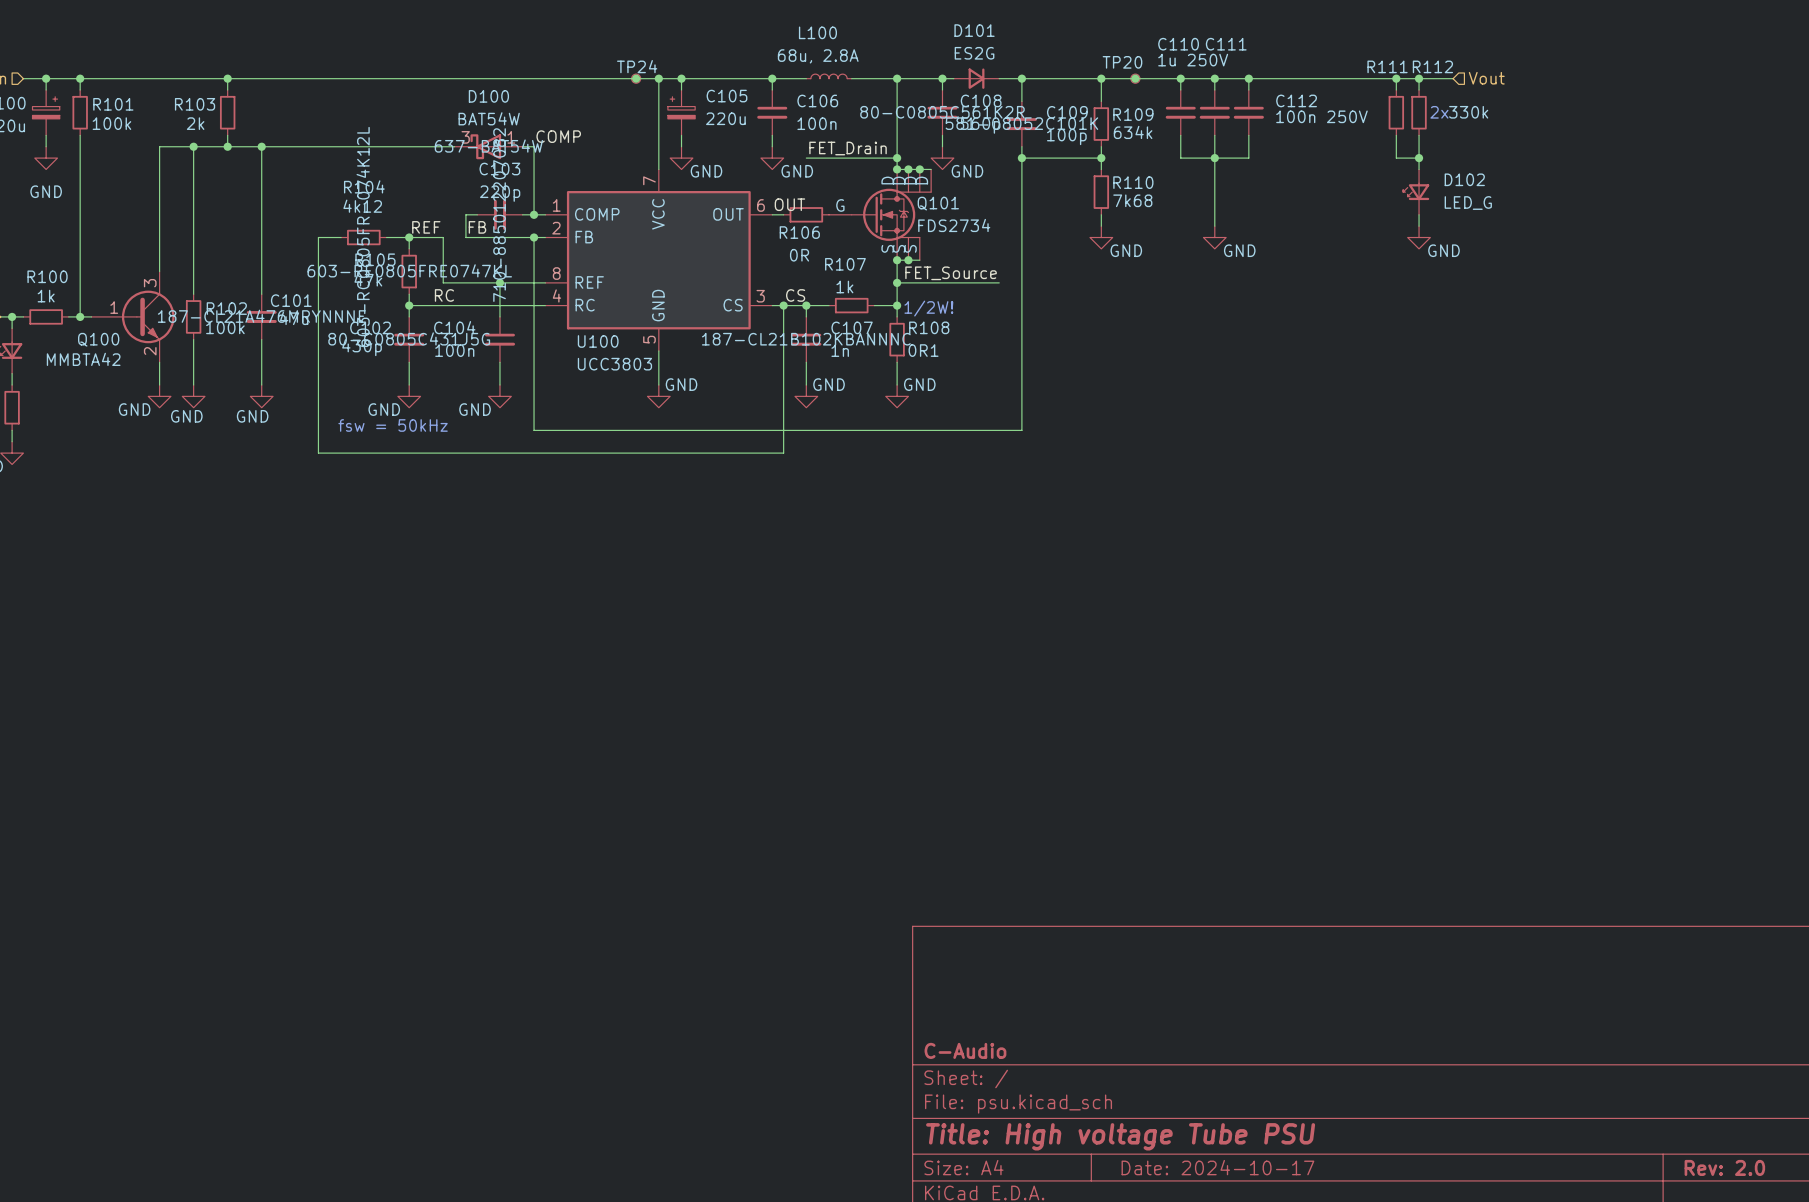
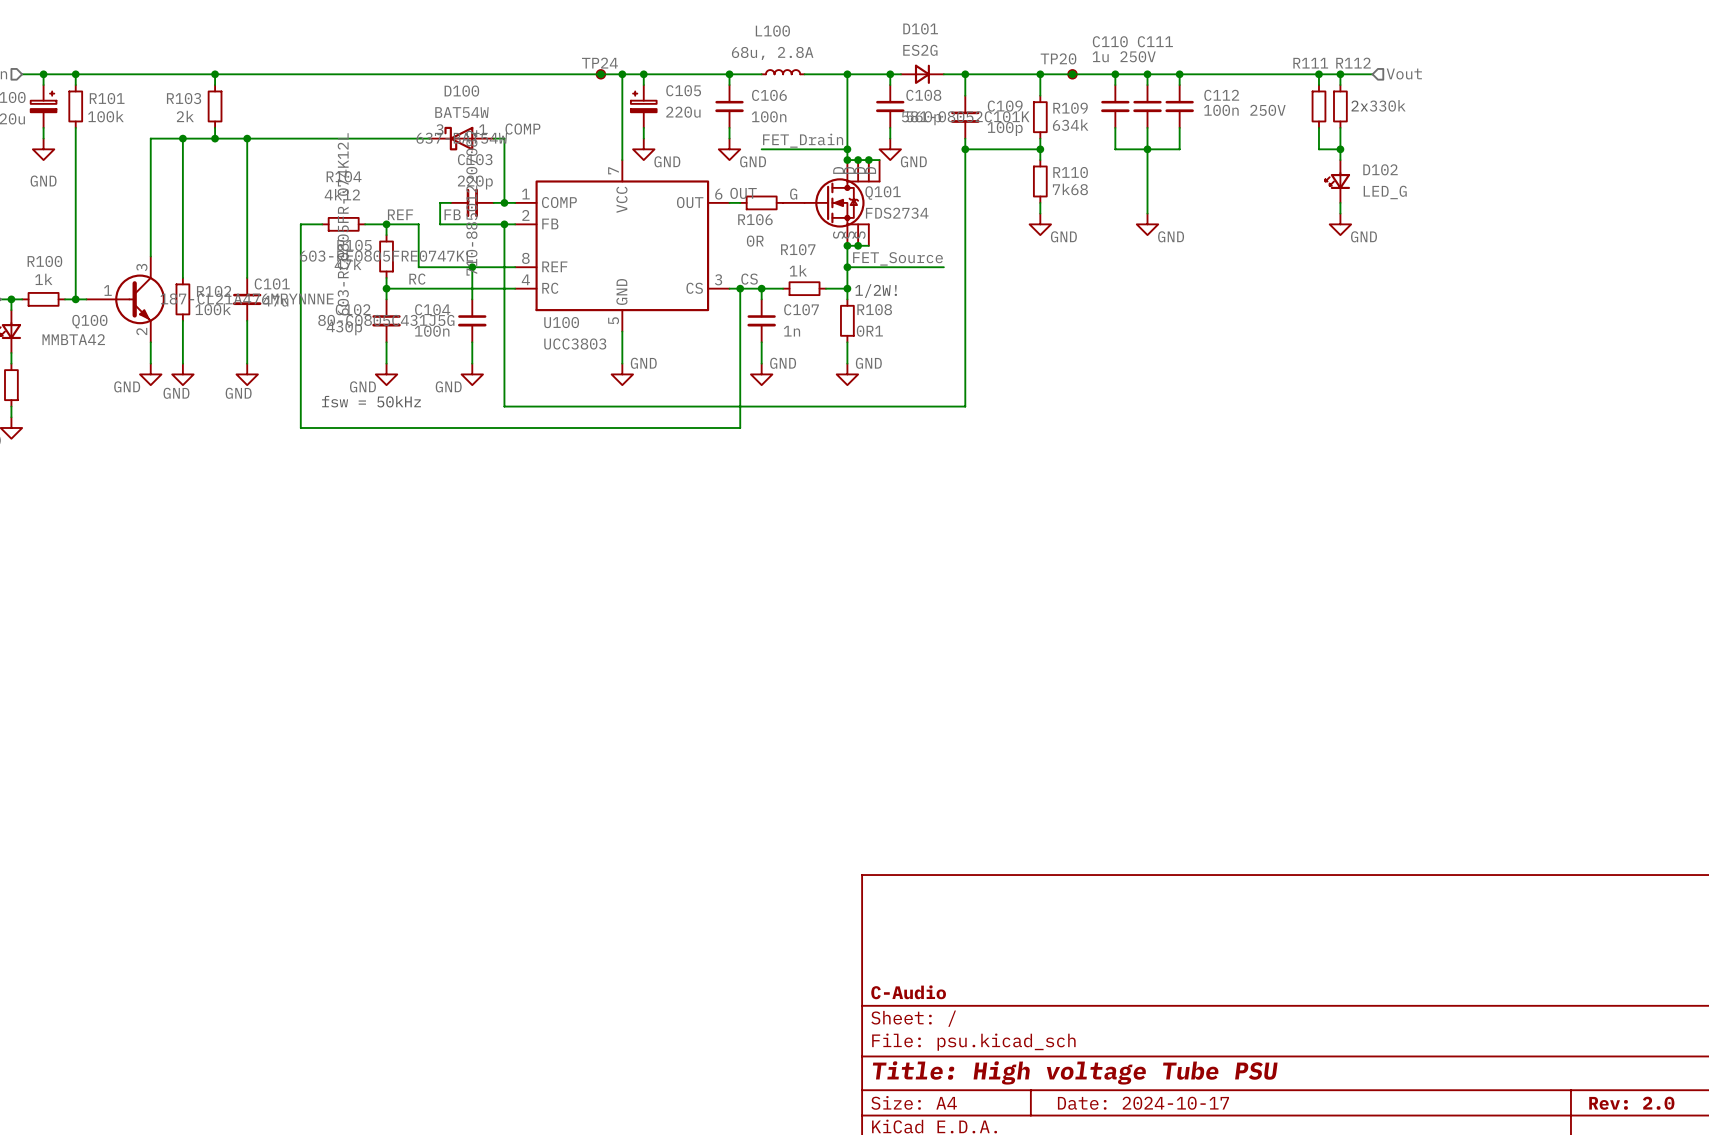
C108 text: 80-C0805C561K2R (942, 112) -> none
C107 text: 187-CL21B102KBANNNC (806, 339) -> none

